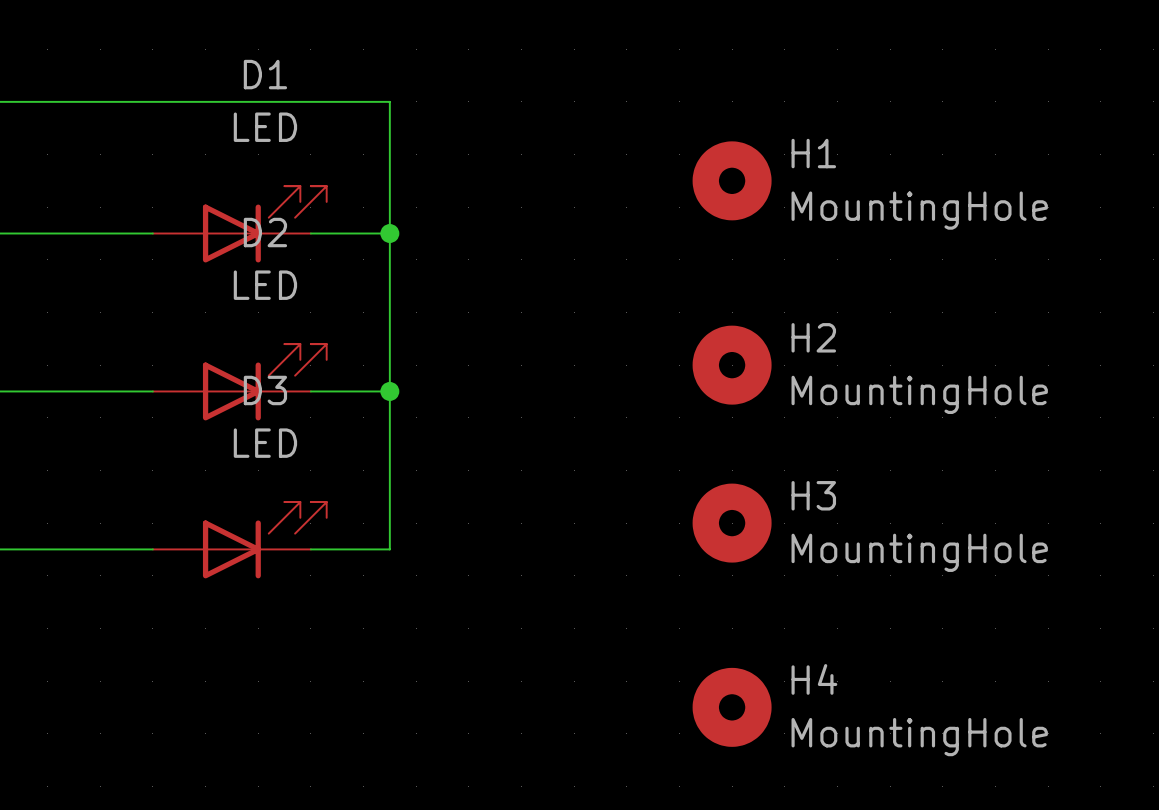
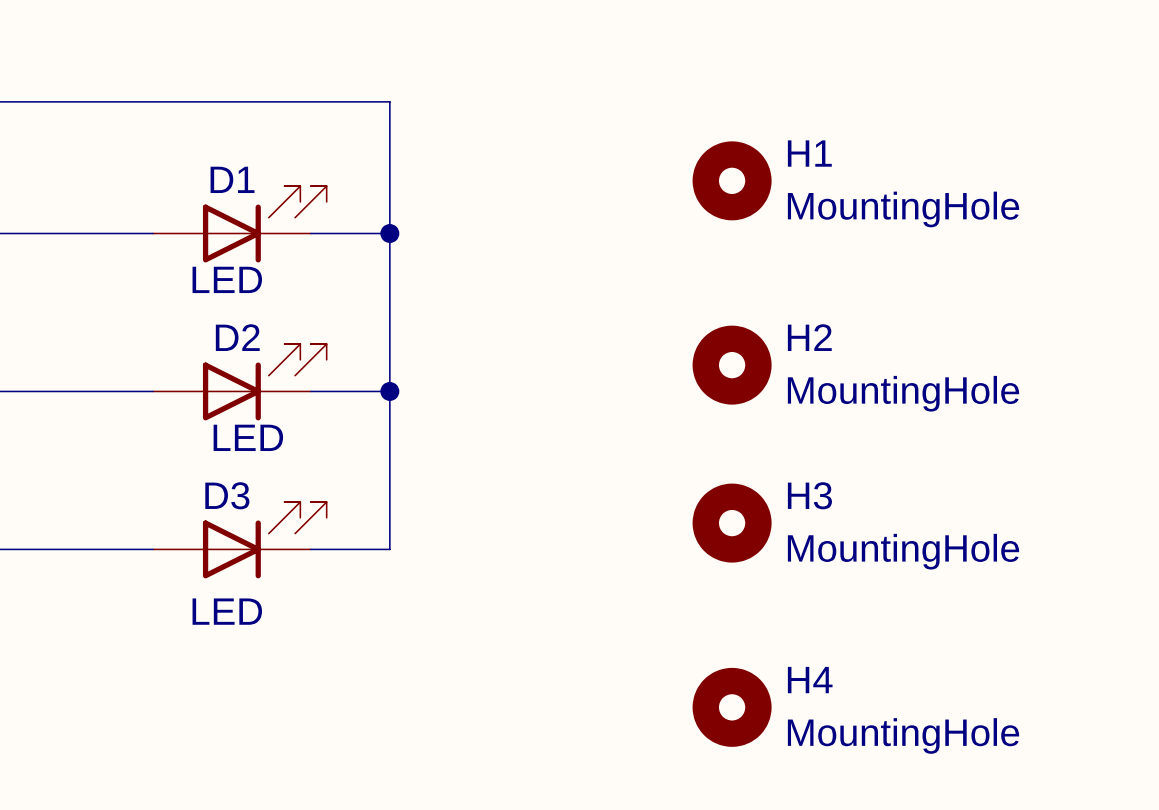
D1 name position: D1 (265, 74) -> D1 (232, 179)
D1 value position: LED (265, 127) -> LED (227, 279)
D2 name position: D2 (265, 232) -> D2 (237, 337)
D2 value position: LED (265, 285) -> LED (248, 437)
D3 name position: D3 (265, 390) -> D3 (227, 495)
D3 value position: LED (265, 443) -> LED (227, 611)

